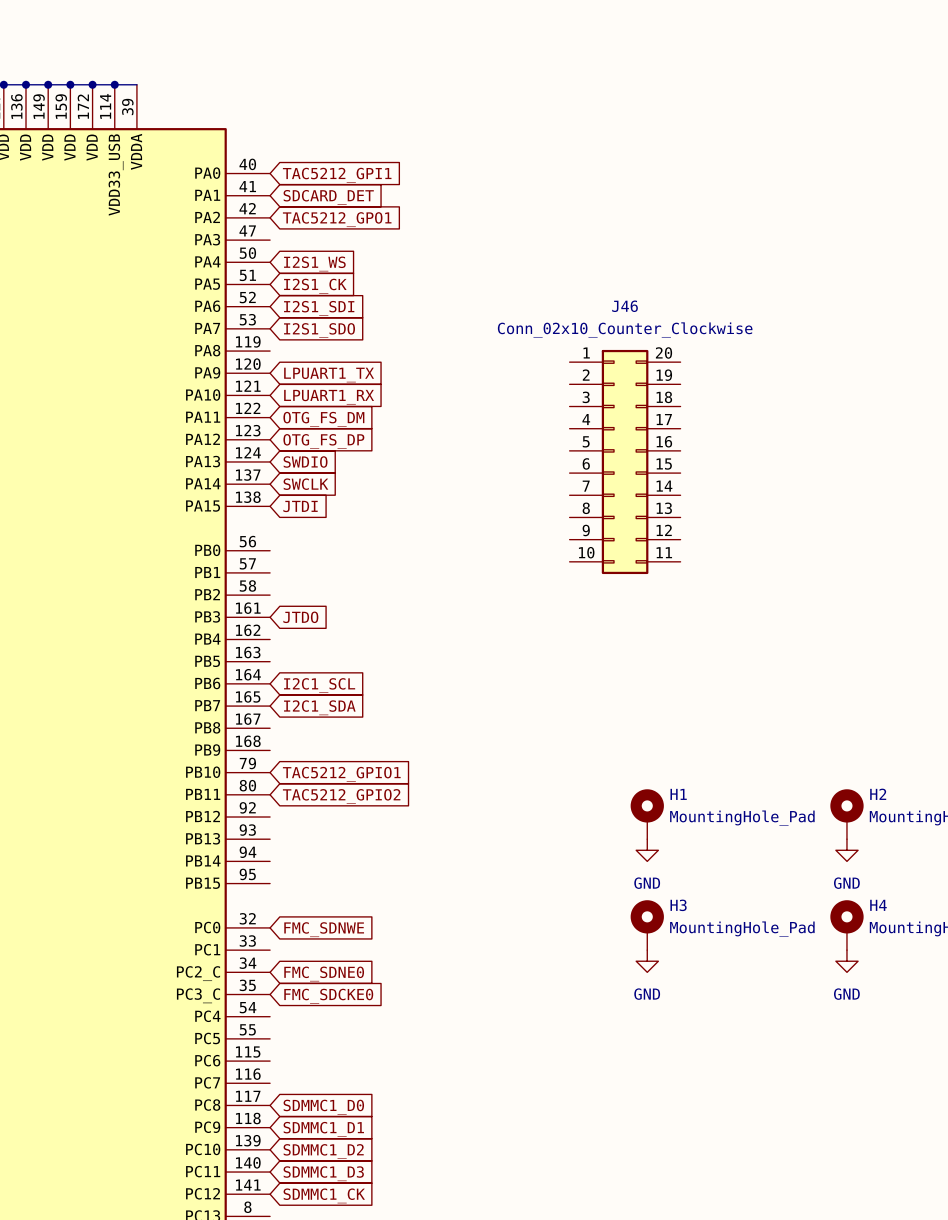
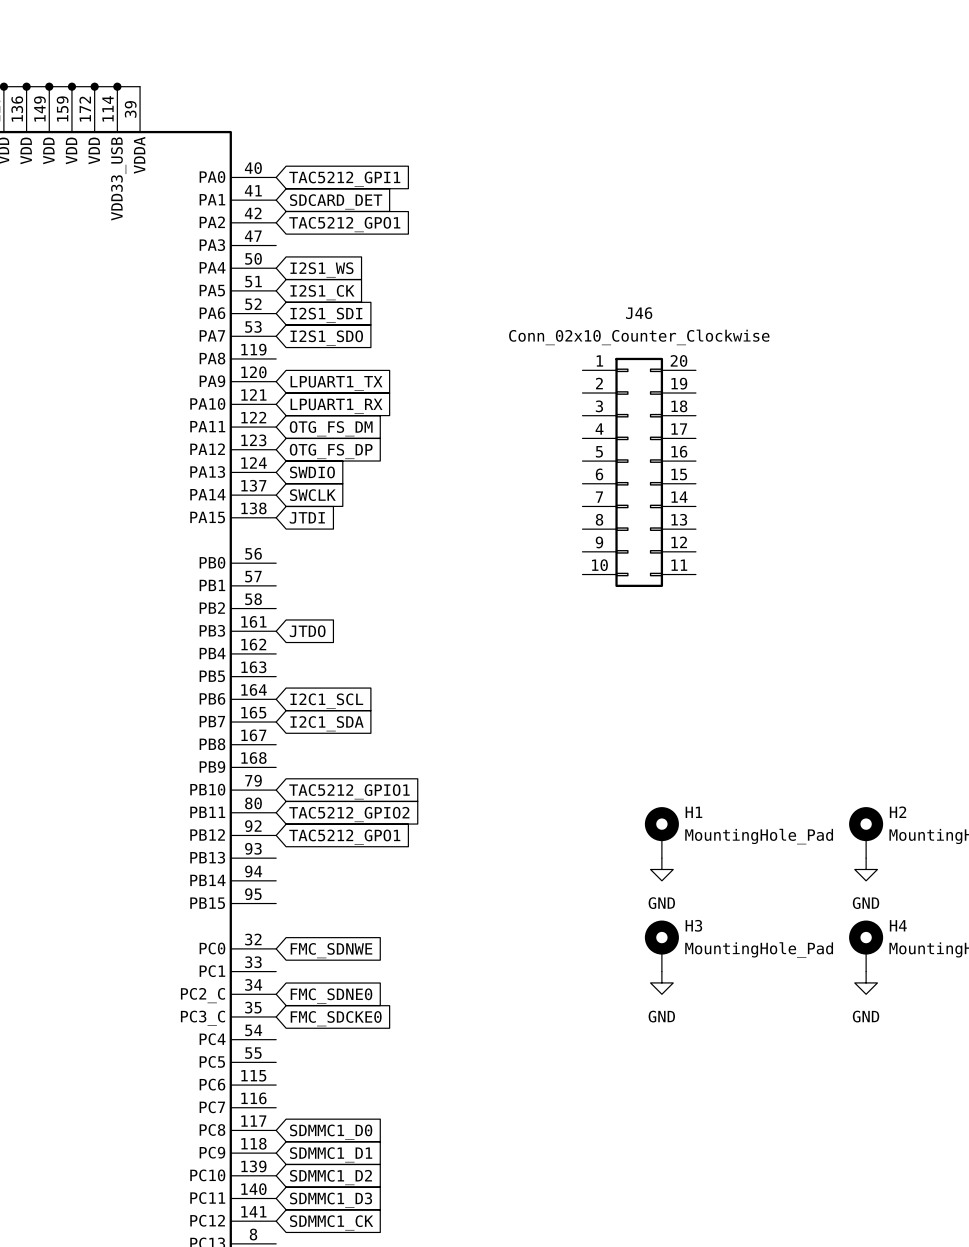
global label: none -> TAC5212_GPO1 (344, 837)

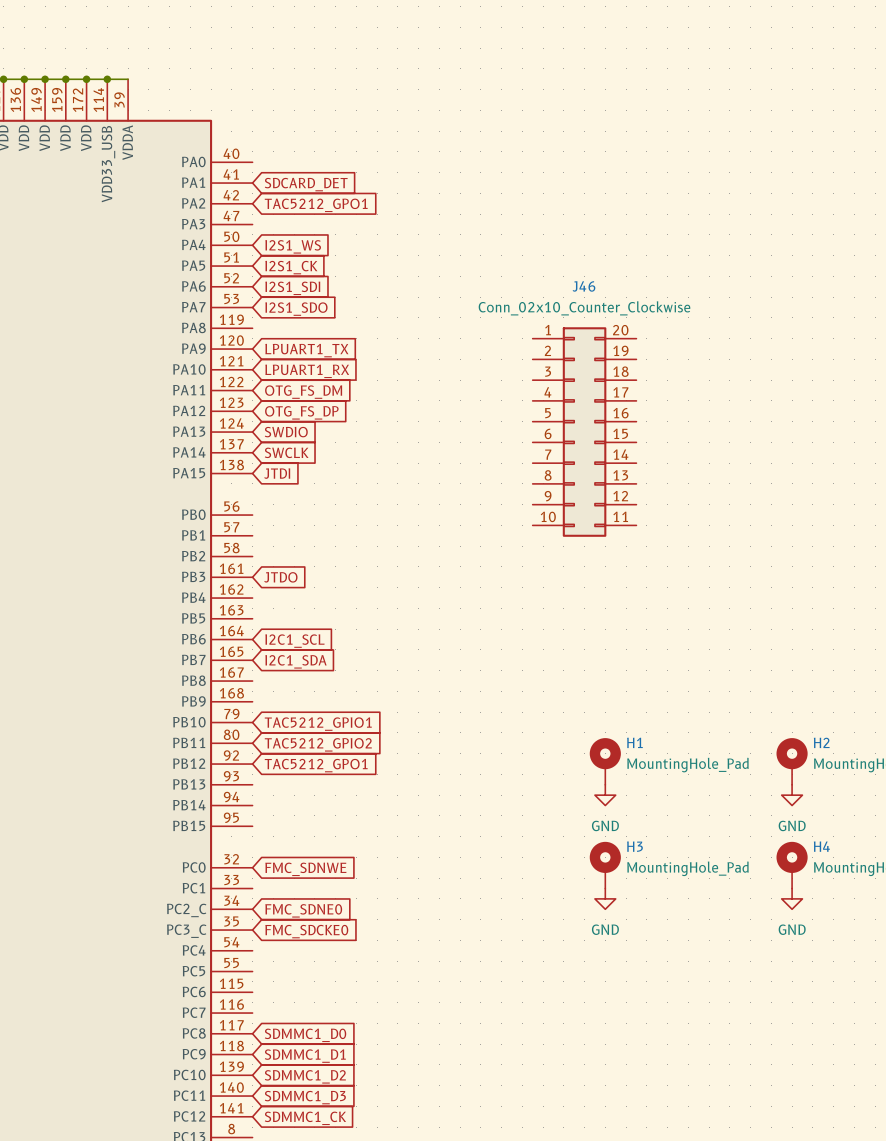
global label: TAC5212_GPI1 (344, 179) -> none

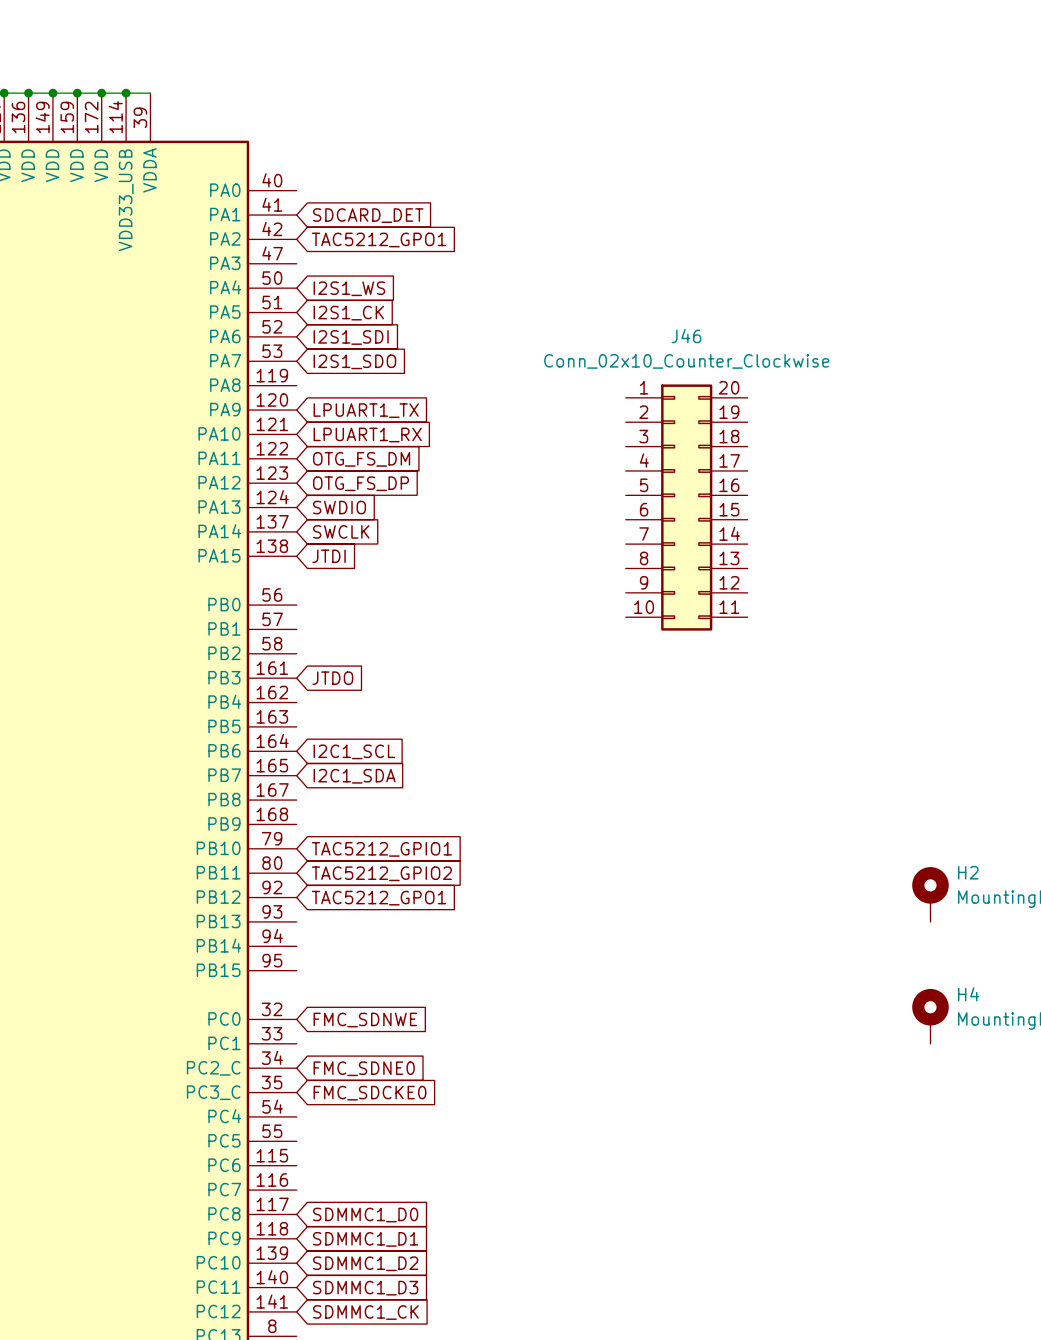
H1: MountingHole_Pad (605, 761) -> none
power symbol: GND (605, 795) -> none
power symbol: GND (792, 795) -> none
H3: MountingHole_Pad (605, 865) -> none
power symbol: GND (605, 898) -> none
power symbol: GND (792, 898) -> none

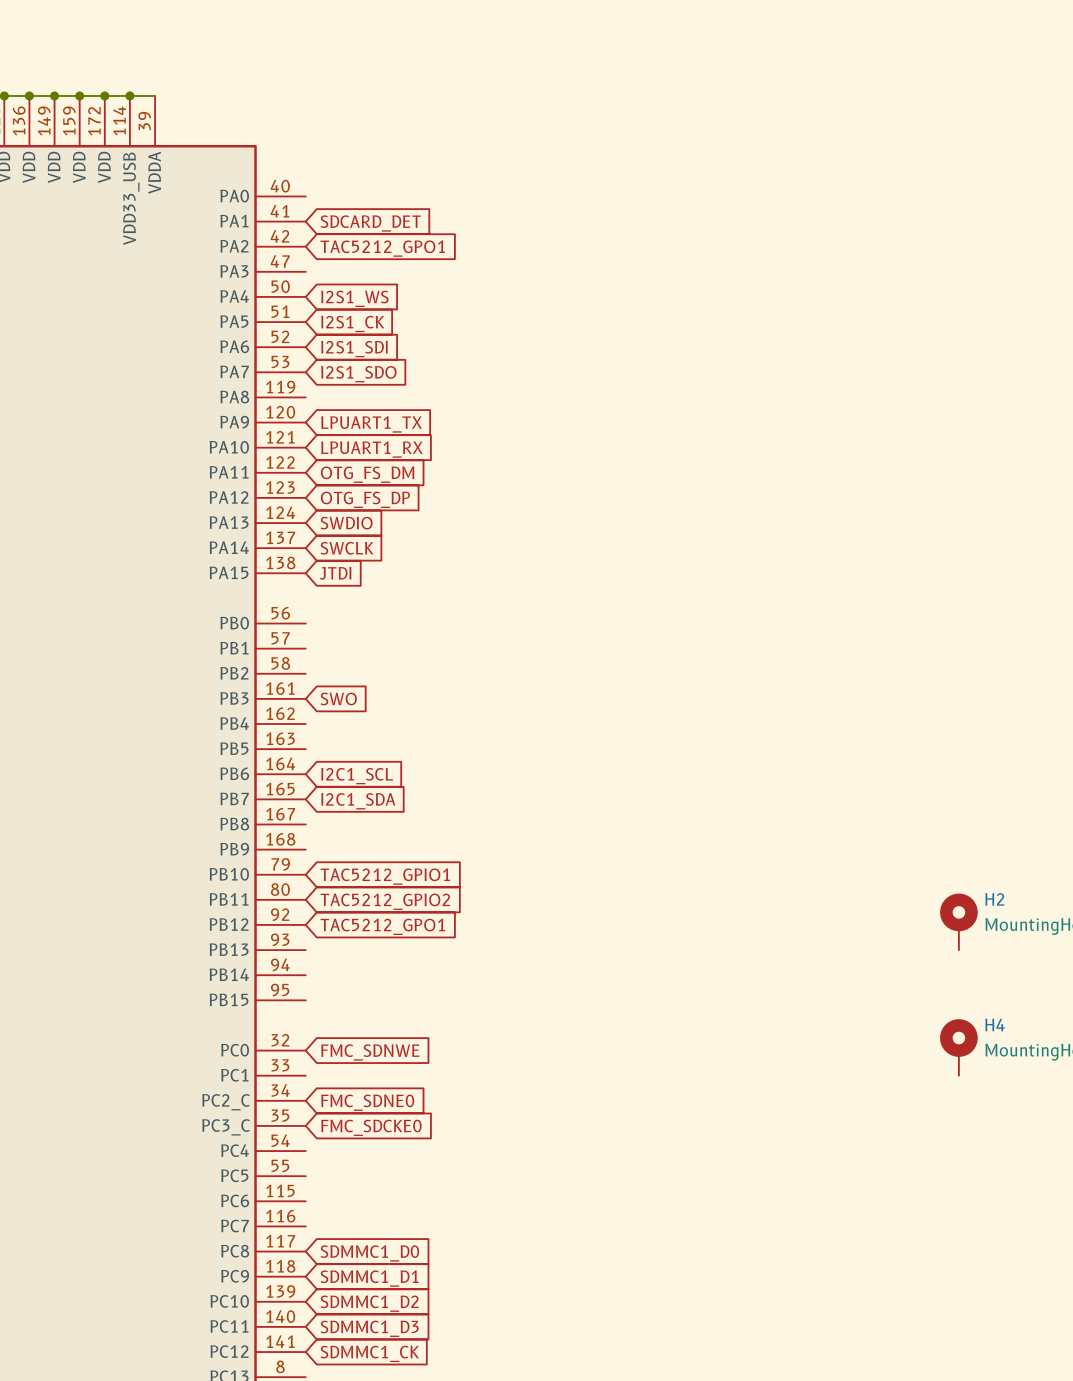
J46: Conn_02x10_Counter_Clockwise (686, 507) -> none
global label: JTDO (332, 678) -> SWO (338, 698)

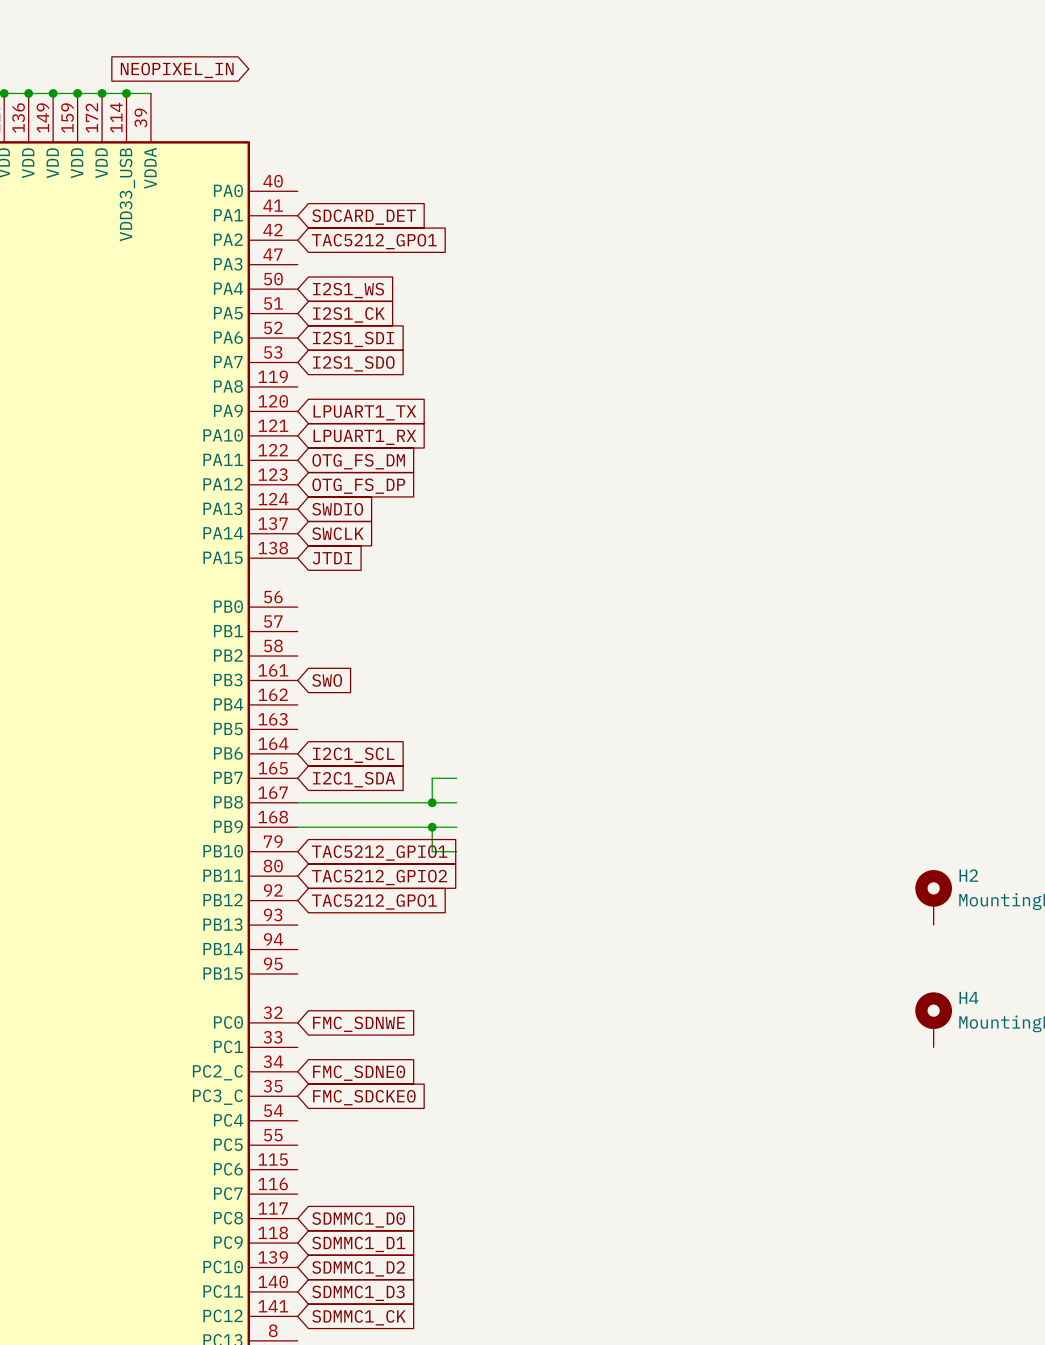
global label: none -> NEOPIXEL_IN (177, 70)
wire: none -> (456, 778) (432, 778) (432, 802)
wire: none -> (297, 802) (456, 802)
junction: none -> (432, 802)
wire: none -> (297, 827) (456, 827)
wire: none -> (432, 827) (432, 851) (456, 851)
junction: none -> (432, 827)

